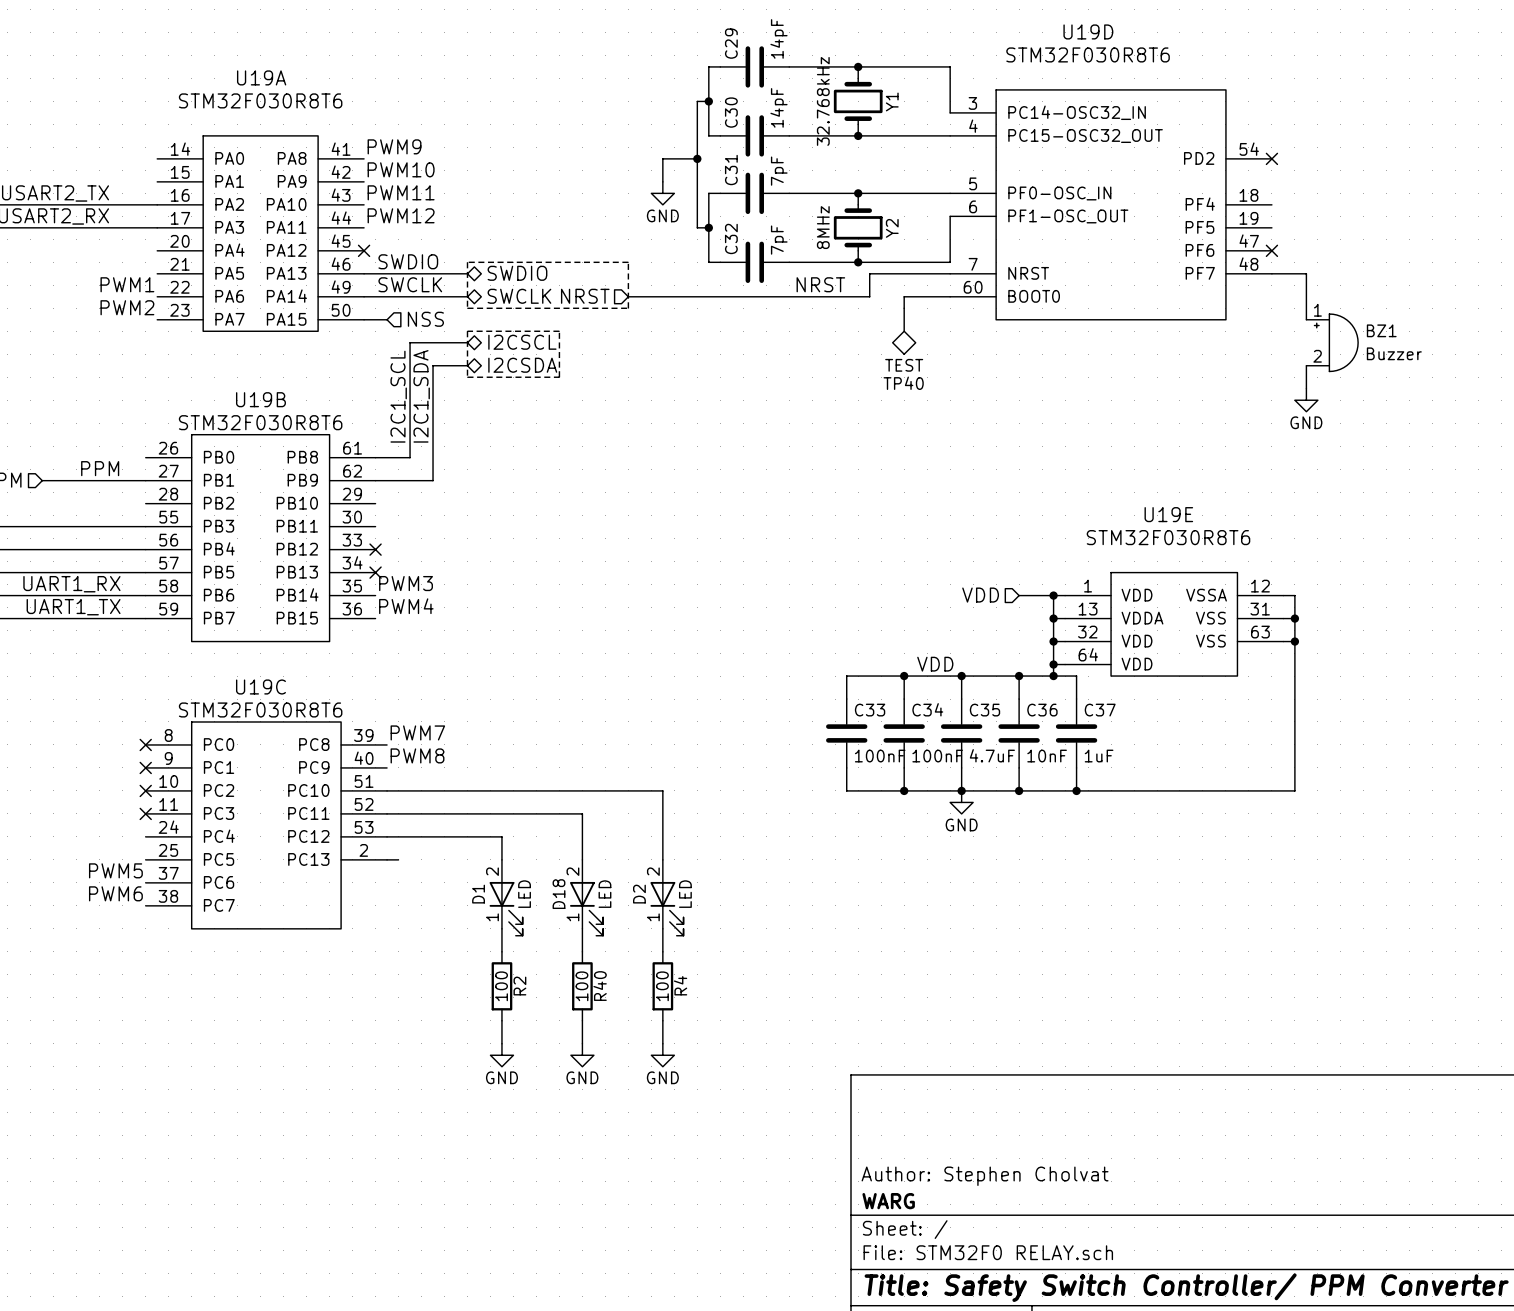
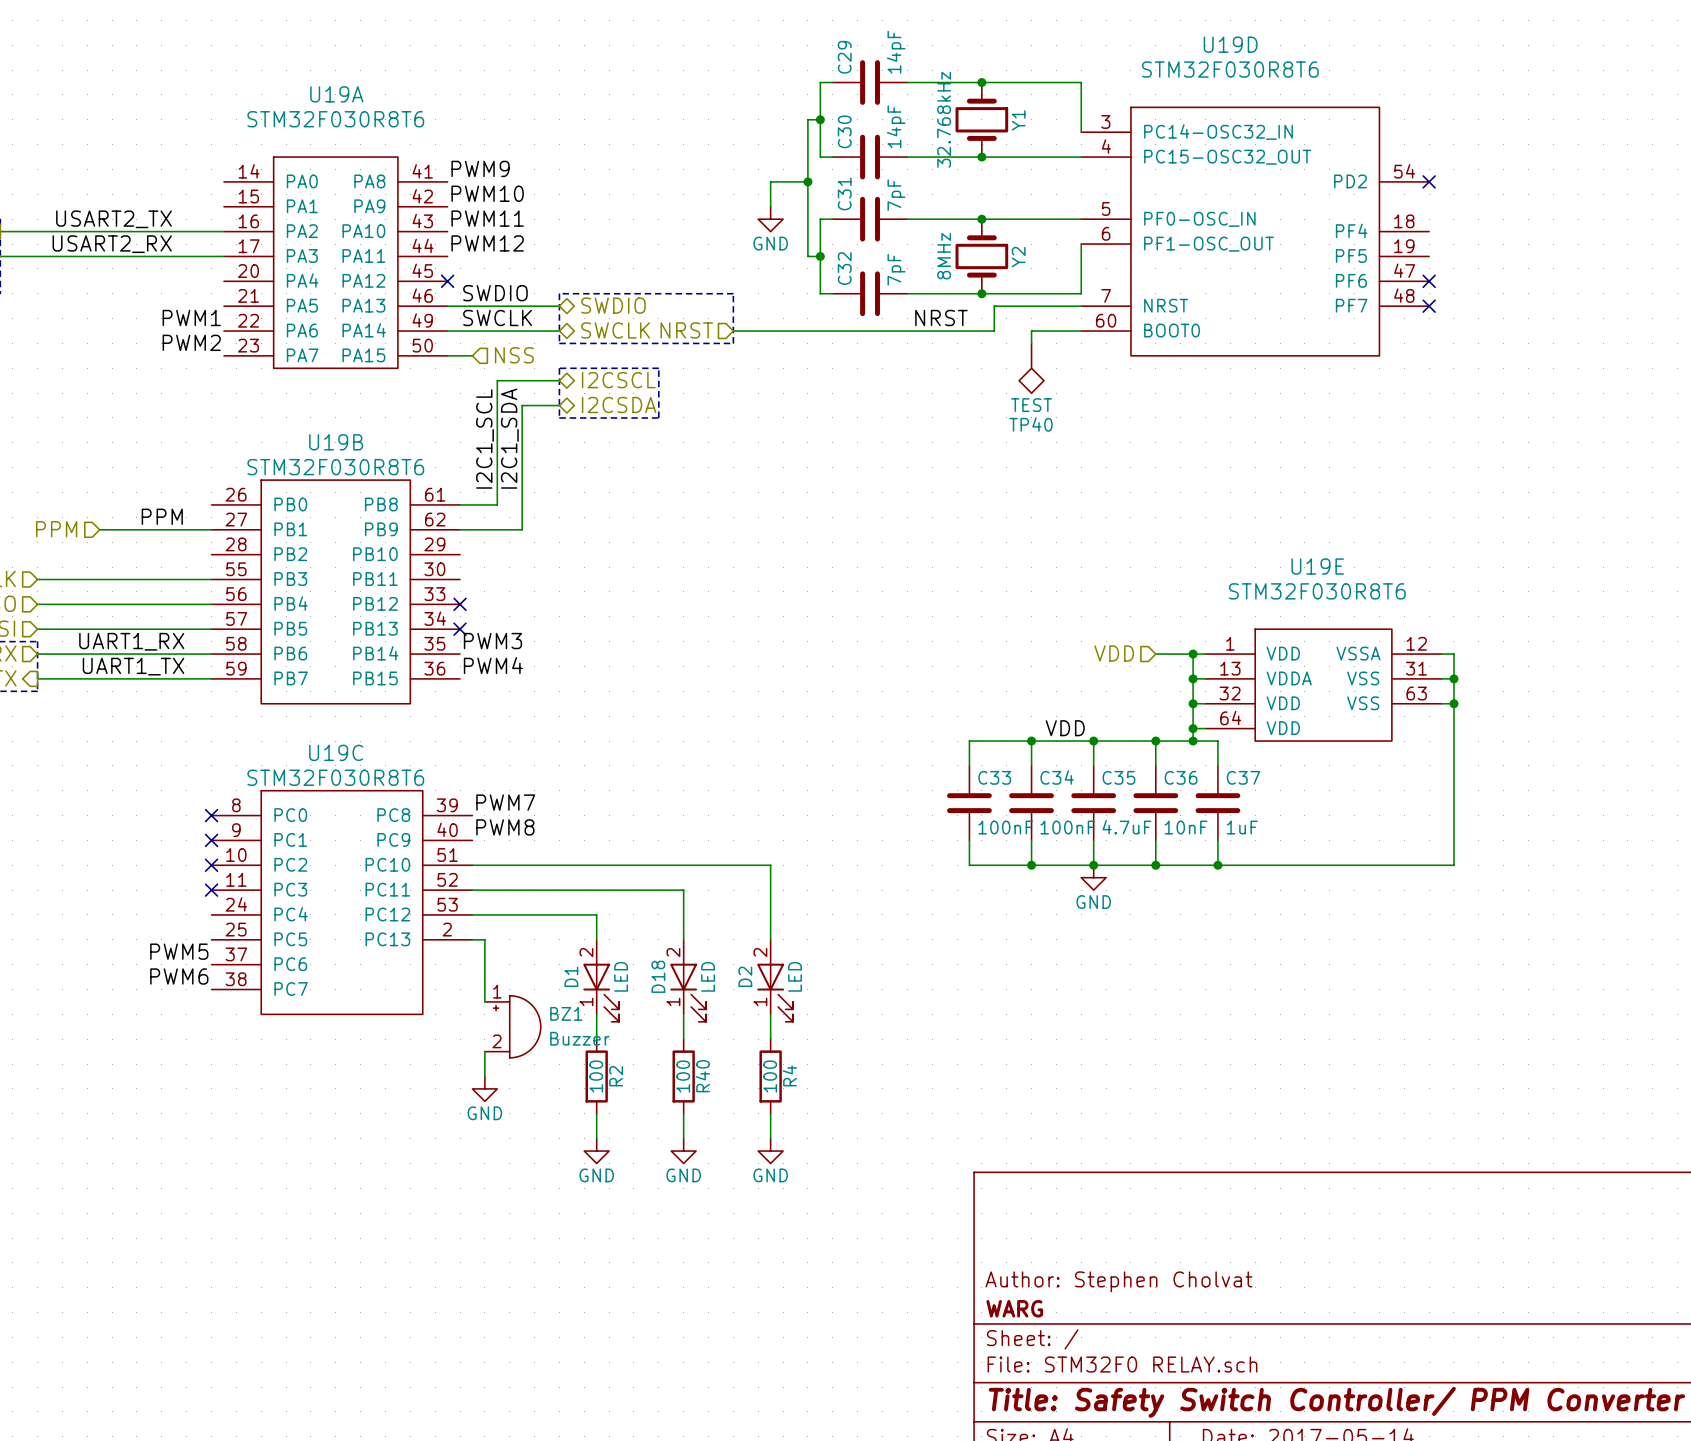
wire: (1271, 273) (1306, 273) (1306, 319) -> none
no-connect mark: none -> (1429, 306)
BZ1 position: (1332, 342) -> (512, 1026)
wire: (1306, 365) (1306, 388) -> none
power symbol: GND (1306, 400) -> none
wire: none -> (484, 939) (484, 1001)
wire: none -> (484, 1051) (484, 1076)
power symbol: none -> GND (484, 1088)

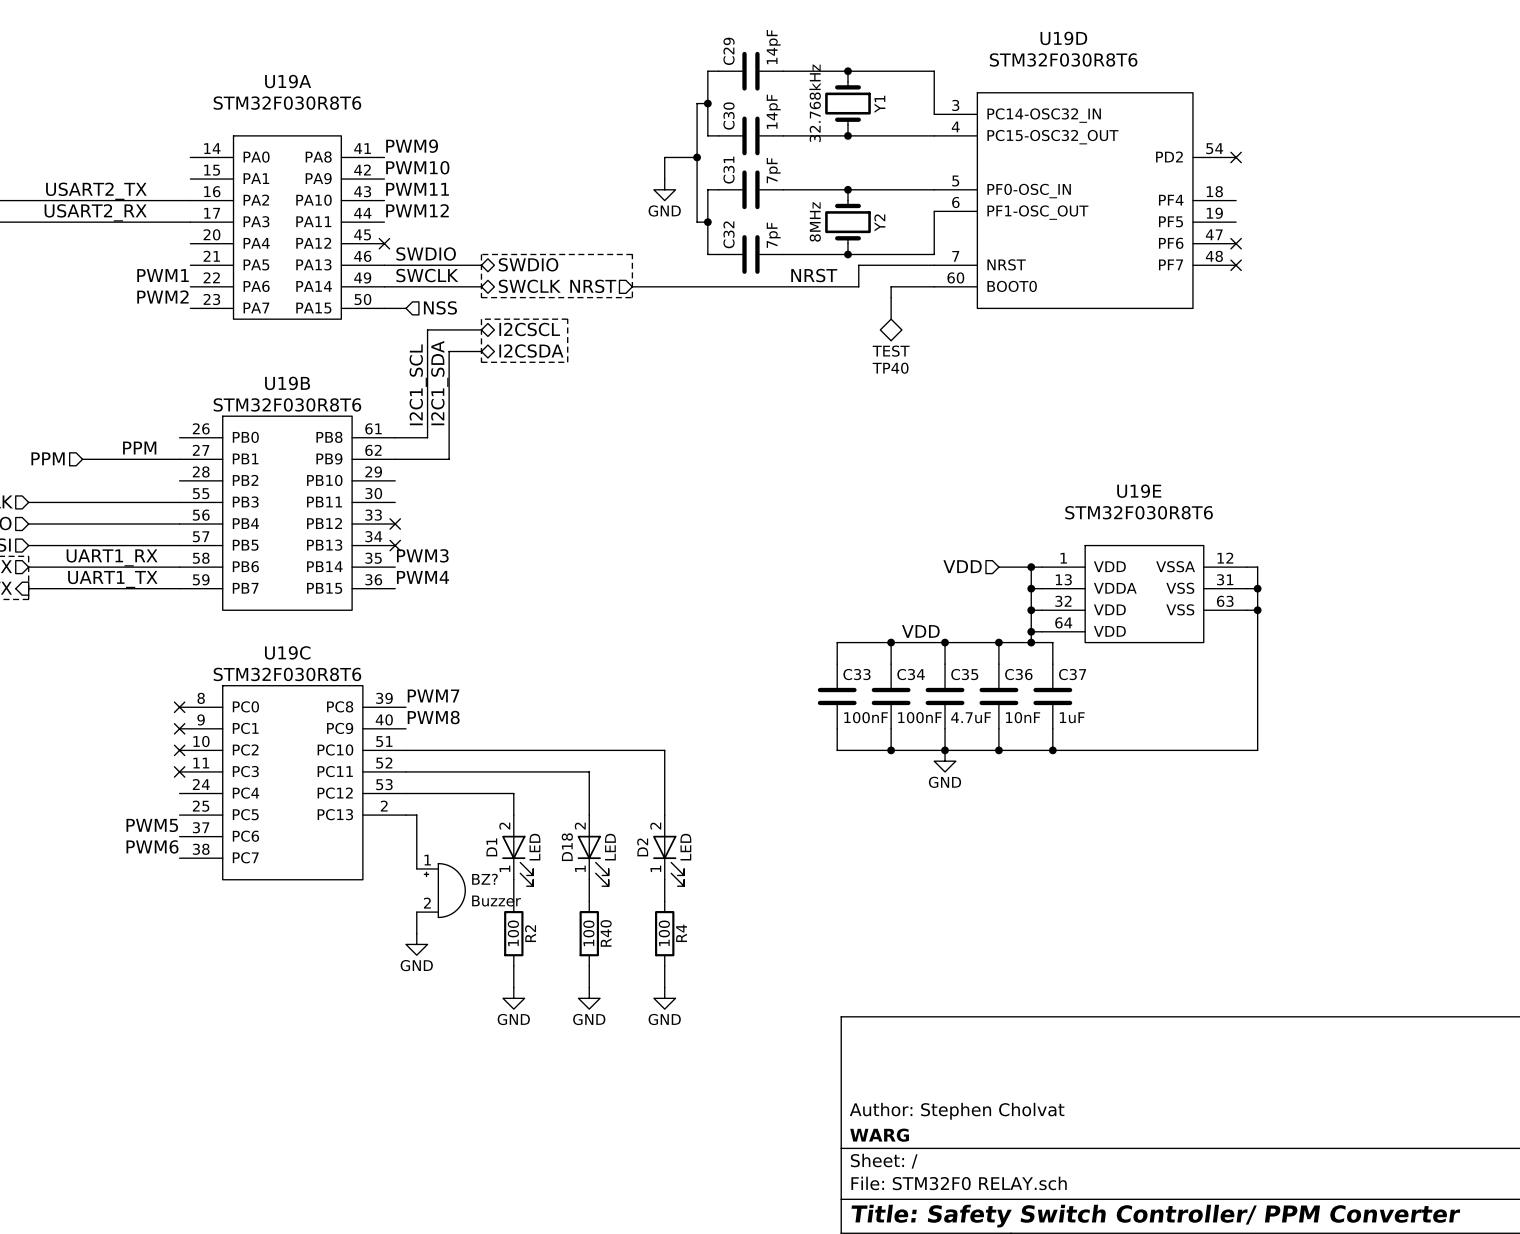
BZ1 name: BZ1 (566, 1013) -> BZ? (484, 879)

